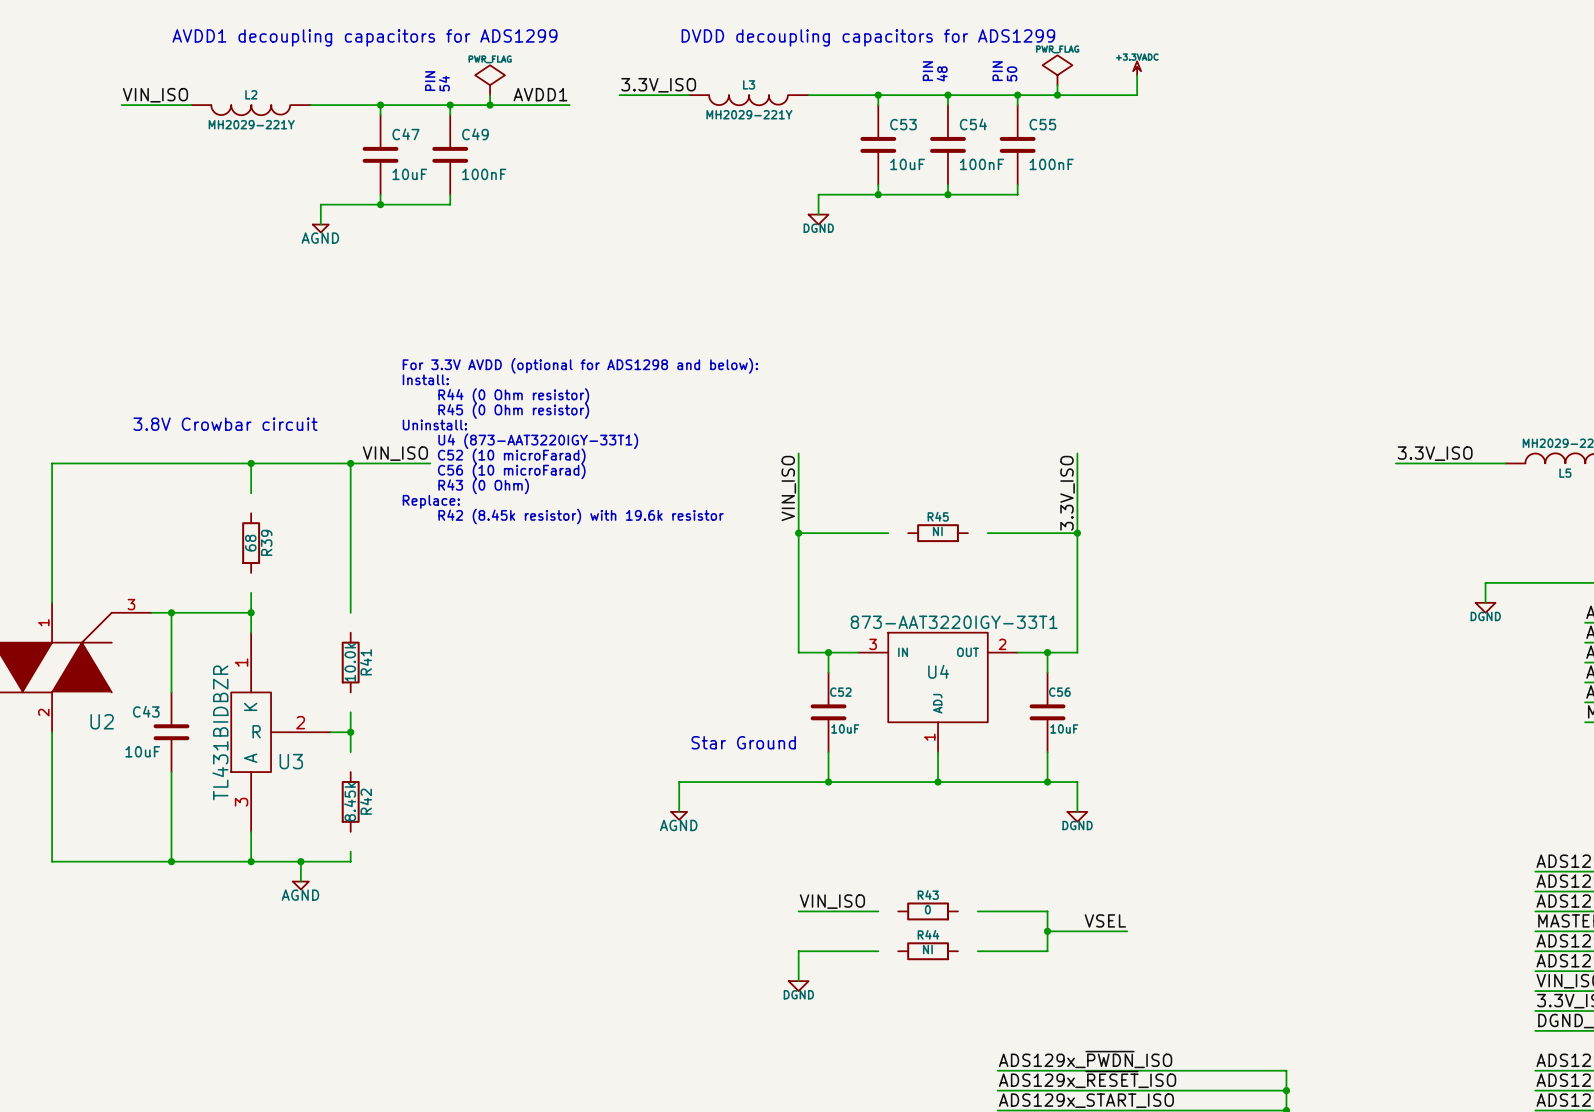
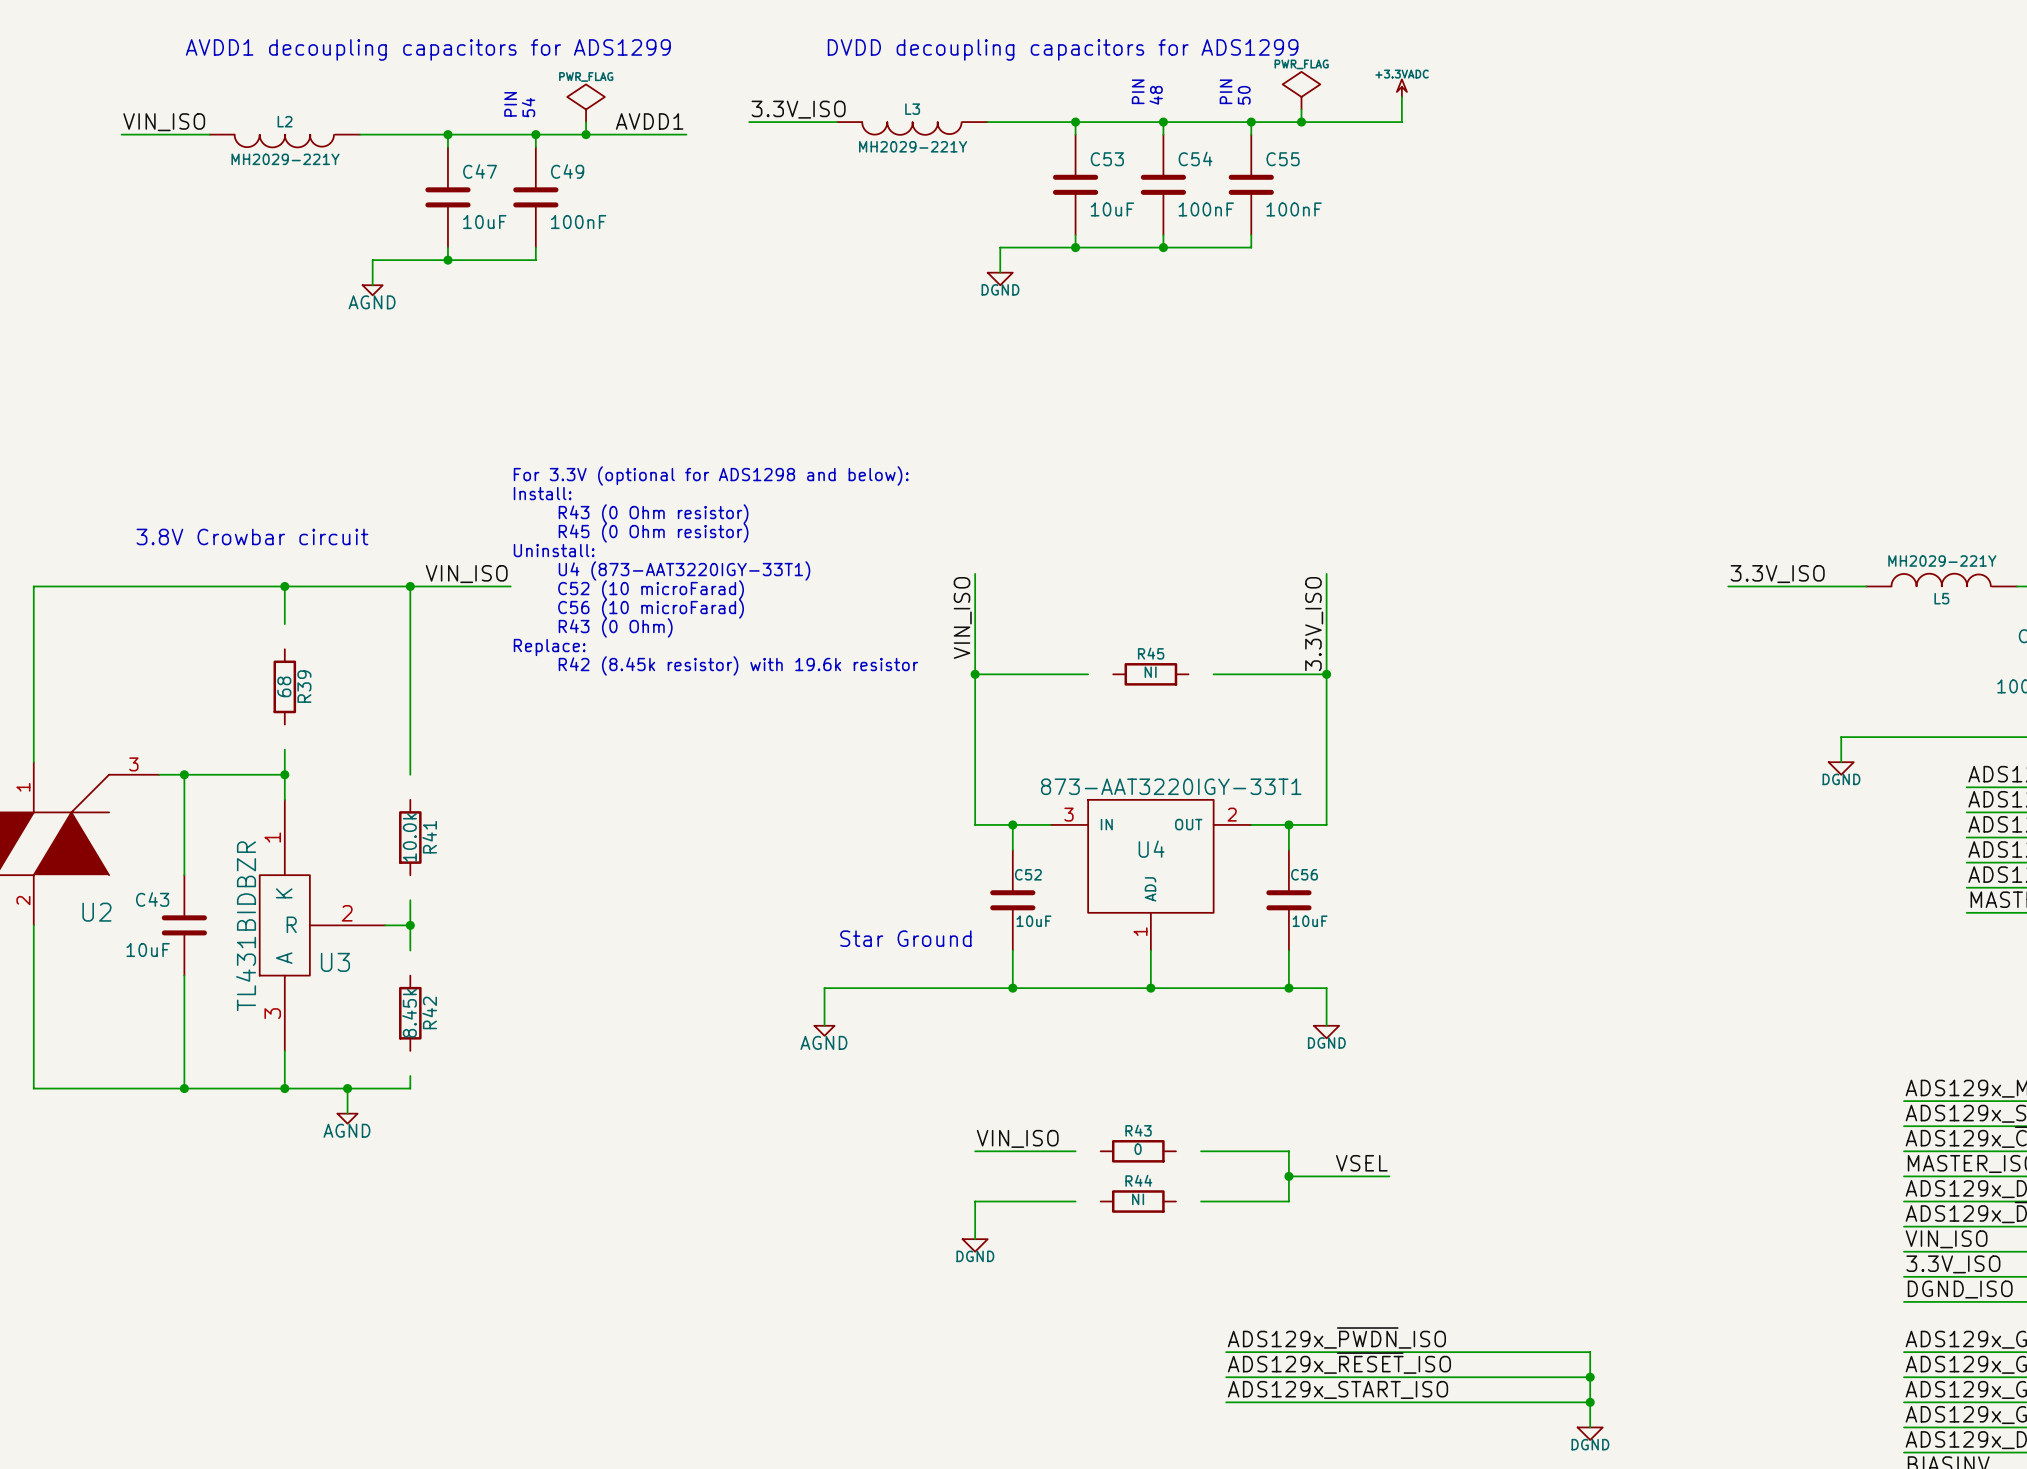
text: For 3.3V AVDD (optional for ADS1298 and below): (580, 365) -> For 3.3V (optional for ADS1298 and below): (711, 475)
text position: Install: (425, 379) -> Install: (542, 493)
text: R44 (0 Ohm resistor) (513, 395) -> R43 (0 Ohm resistor) (653, 513)
text position: R45 (0 Ohm resistor) (513, 411) -> R45 (0 Ohm resistor) (653, 532)
text position: Uninstall: (434, 425) -> Uninstall: (554, 550)
text position: U4 (873-AAT3220IGY-33T1) (538, 441) -> U4 (873-AAT3220IGY-33T1) (684, 570)
text position: C52 (10 microFarad) (511, 456) -> C52 (10 microFarad) (651, 589)
text position: C56 (10 microFarad) (511, 471) -> C56 (10 microFarad) (651, 608)
text position: R43 (0 Ohm) (483, 486) -> R43 (0 Ohm) (615, 627)
text position: Replace: (431, 501) -> Replace: (549, 647)
text position: R42 (8.45k resistor) with 19.6k resistor (581, 516) -> R42 (8.45k resistor) with 19.6k resistor (738, 665)

